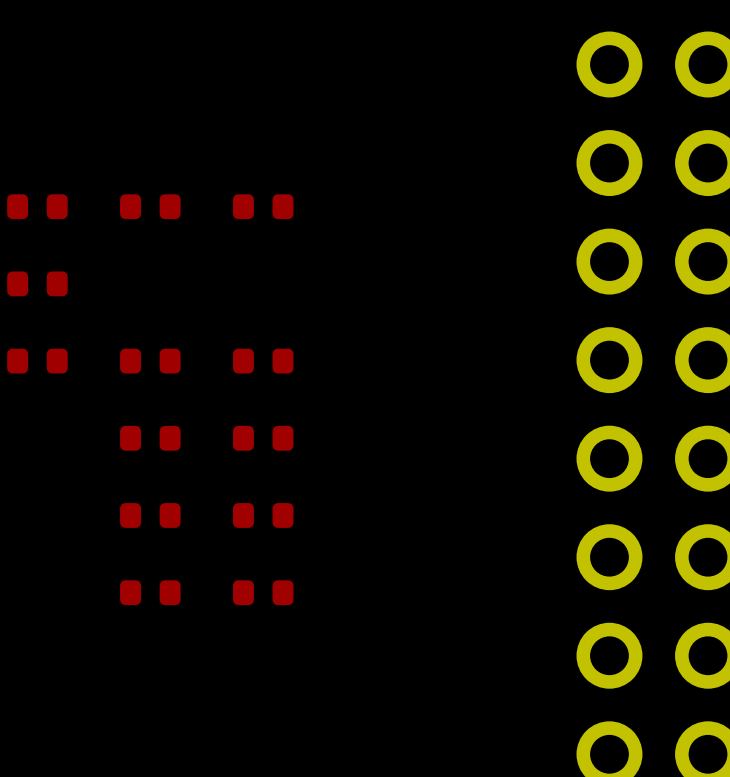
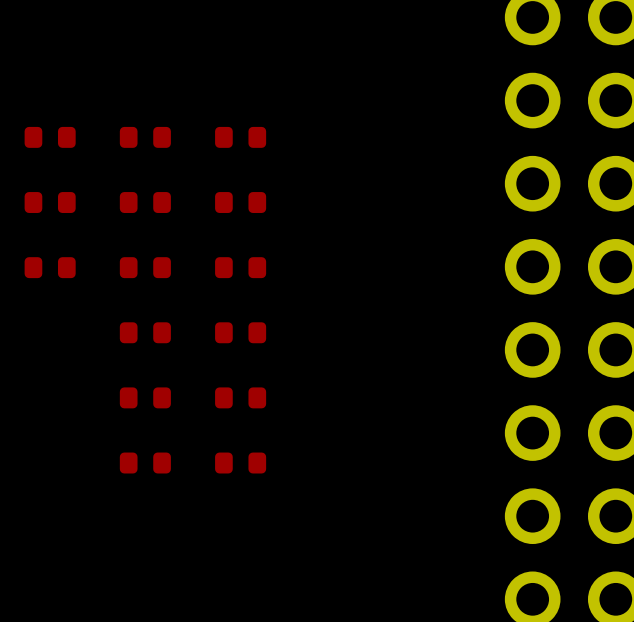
part: none -> (145, 202)
part: none -> (240, 202)

